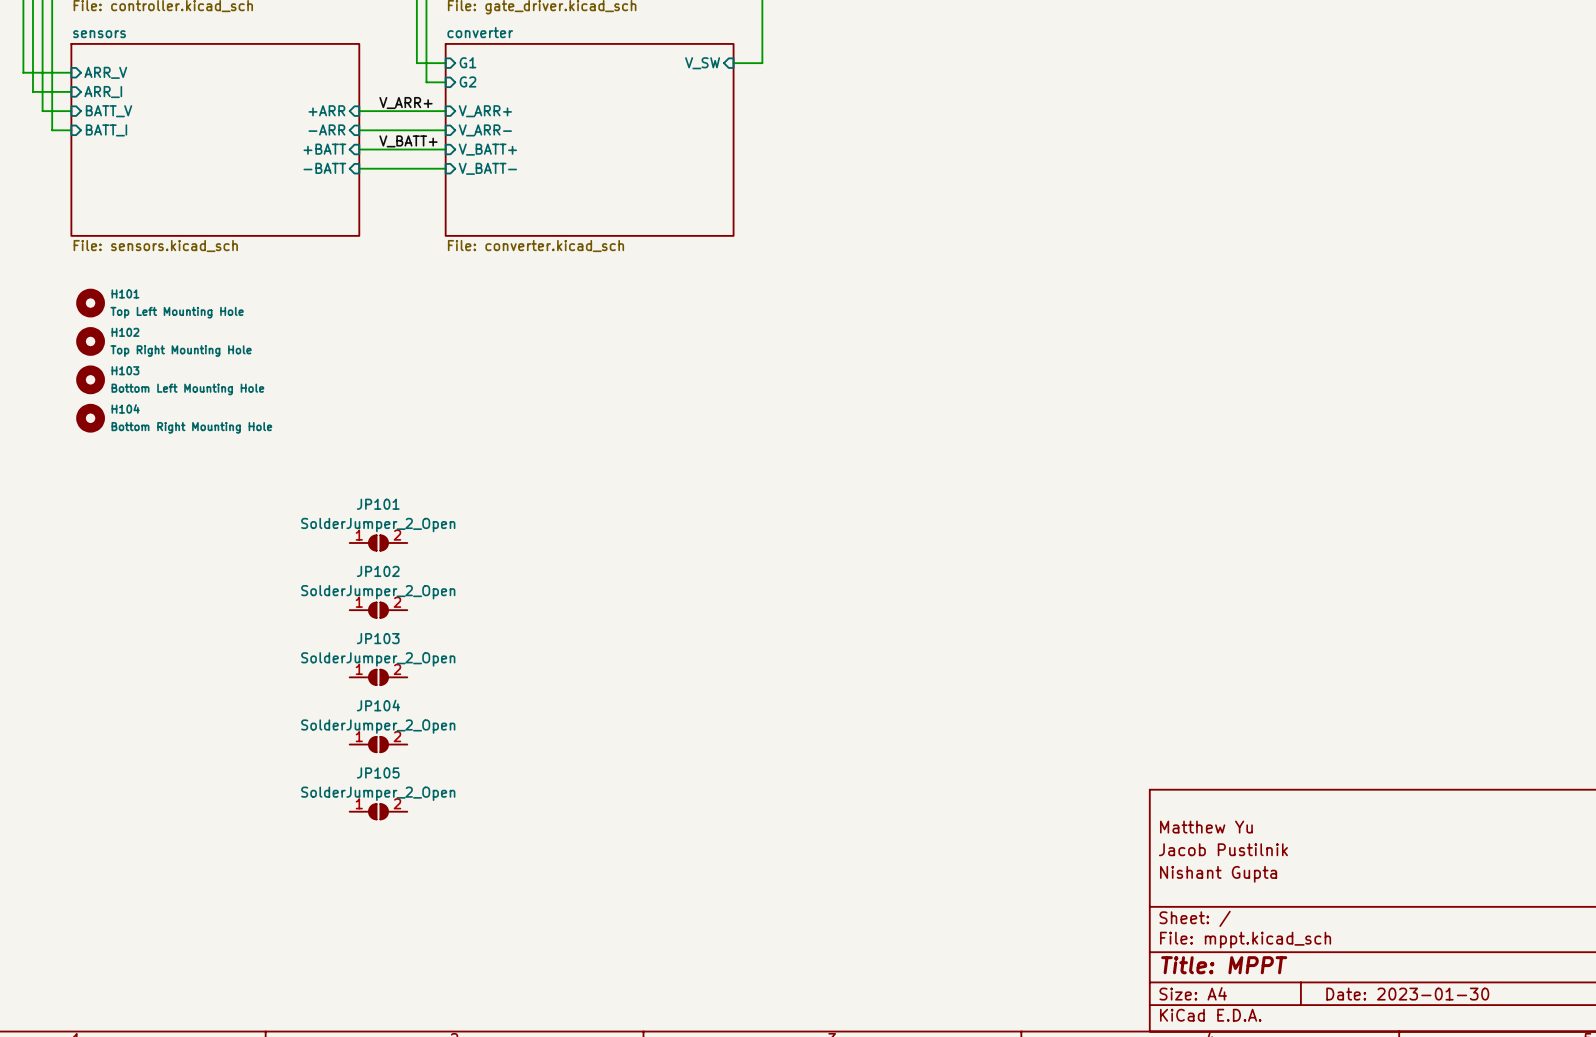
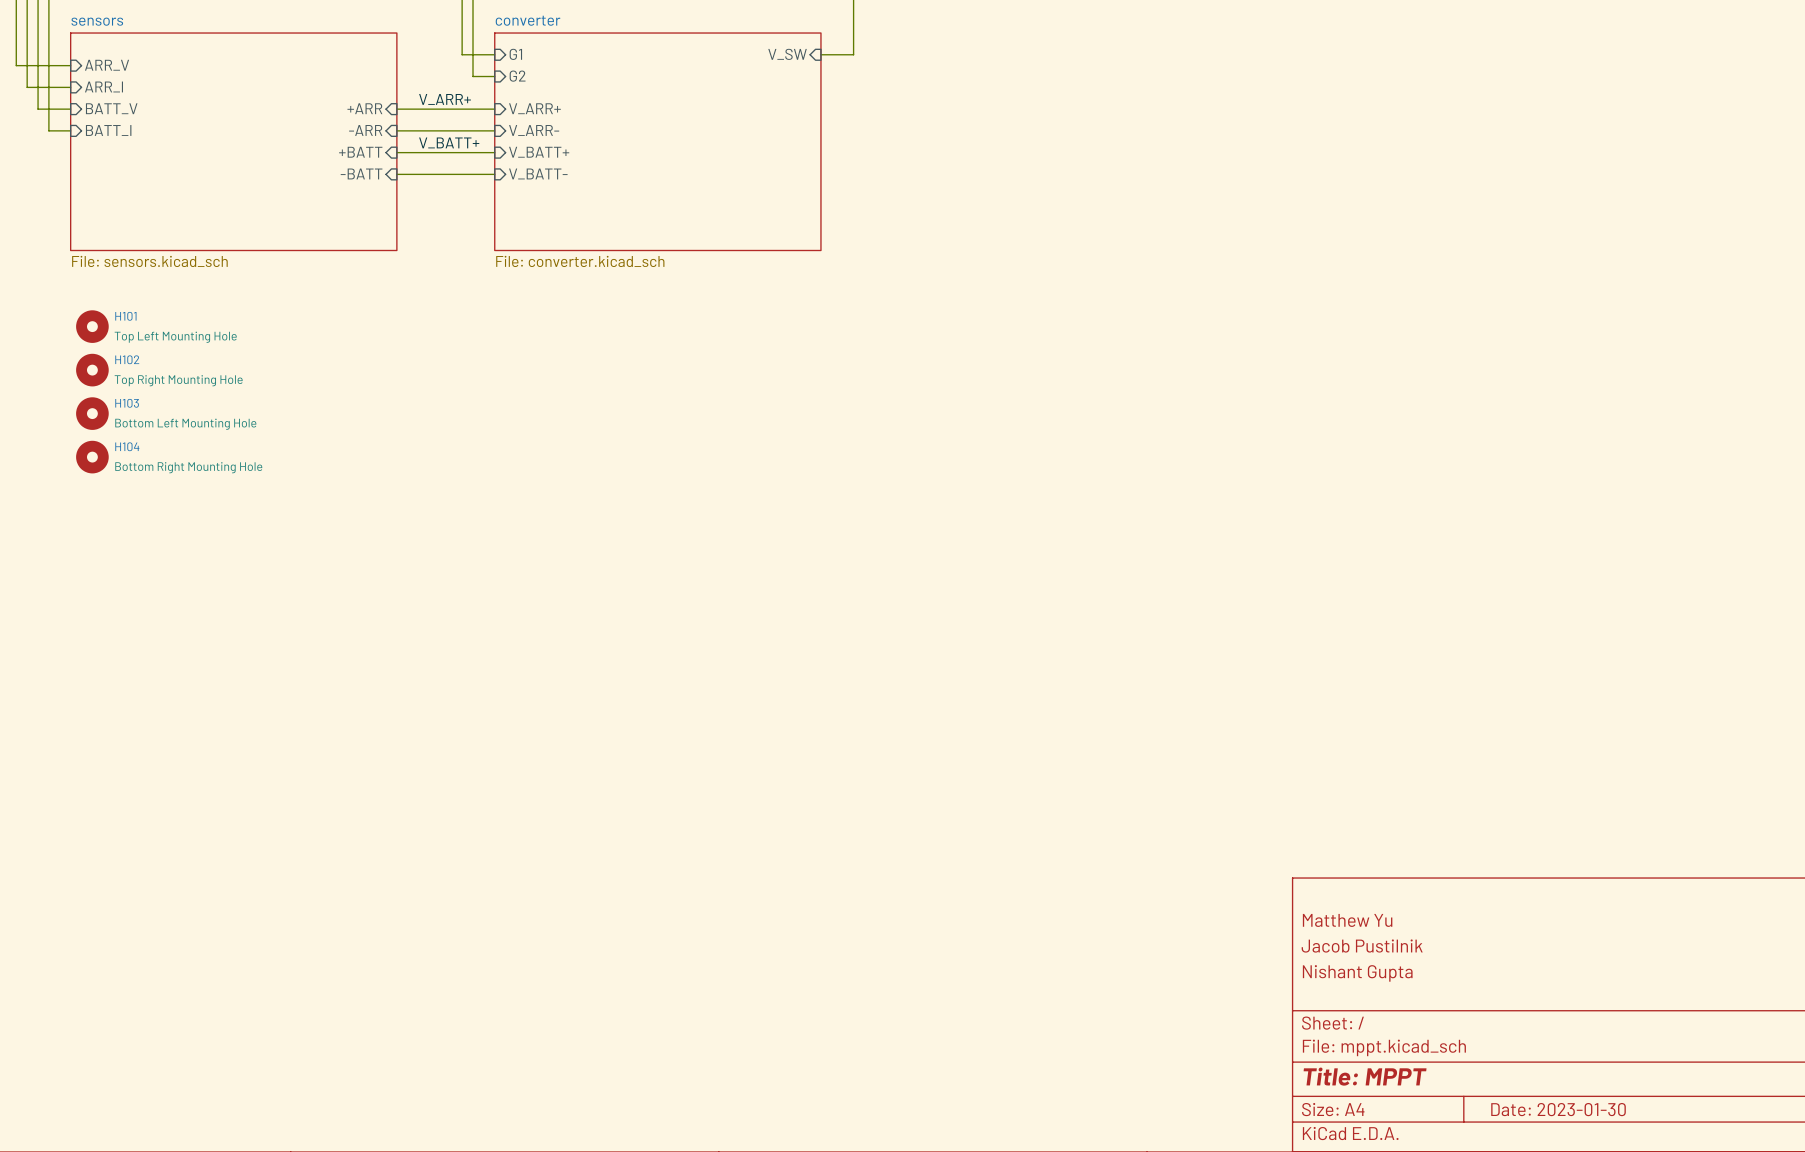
JP101: SolderJumper_2_Open (378, 542) -> none
JP102: SolderJumper_2_Open (378, 610) -> none
JP103: SolderJumper_2_Open (378, 677) -> none
JP104: SolderJumper_2_Open (378, 744) -> none
JP105: SolderJumper_2_Open (378, 811) -> none

